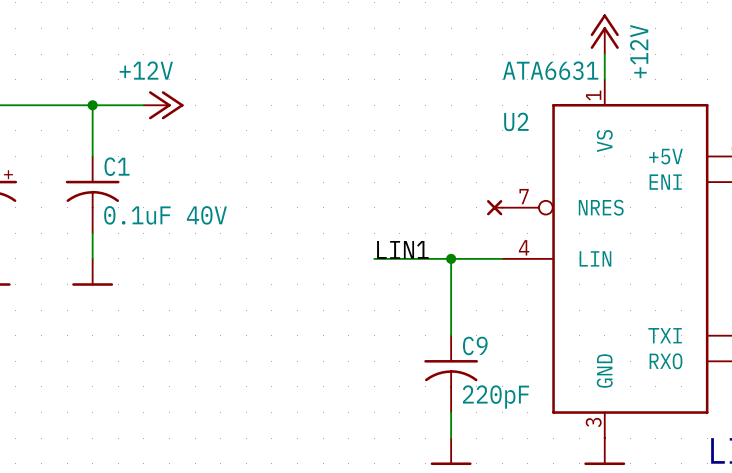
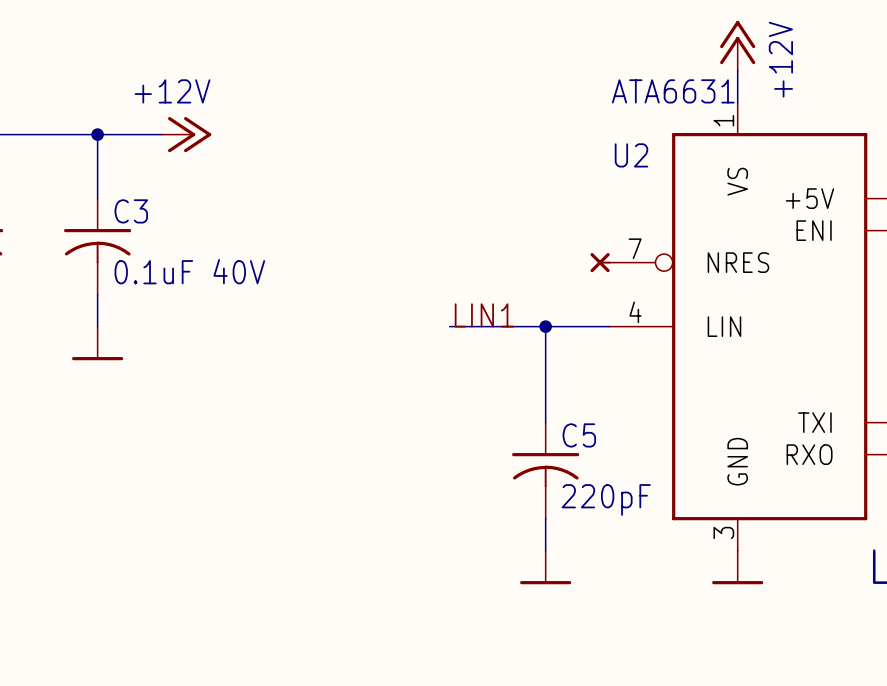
C1 name: C1 (117, 166) -> C3 (131, 211)
C9 name: C9 (475, 345) -> C5 (579, 435)

